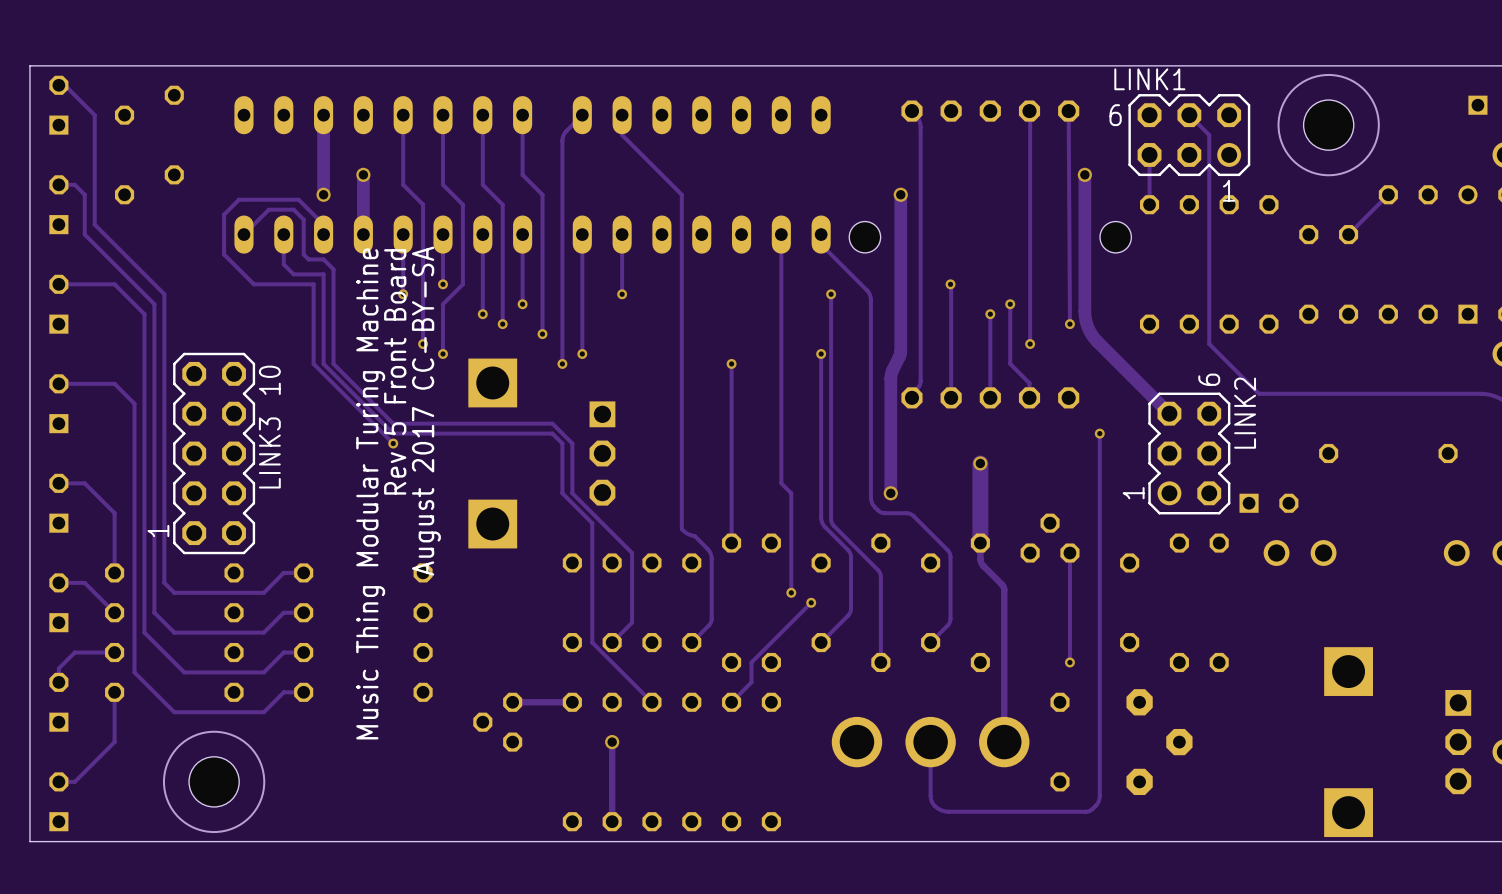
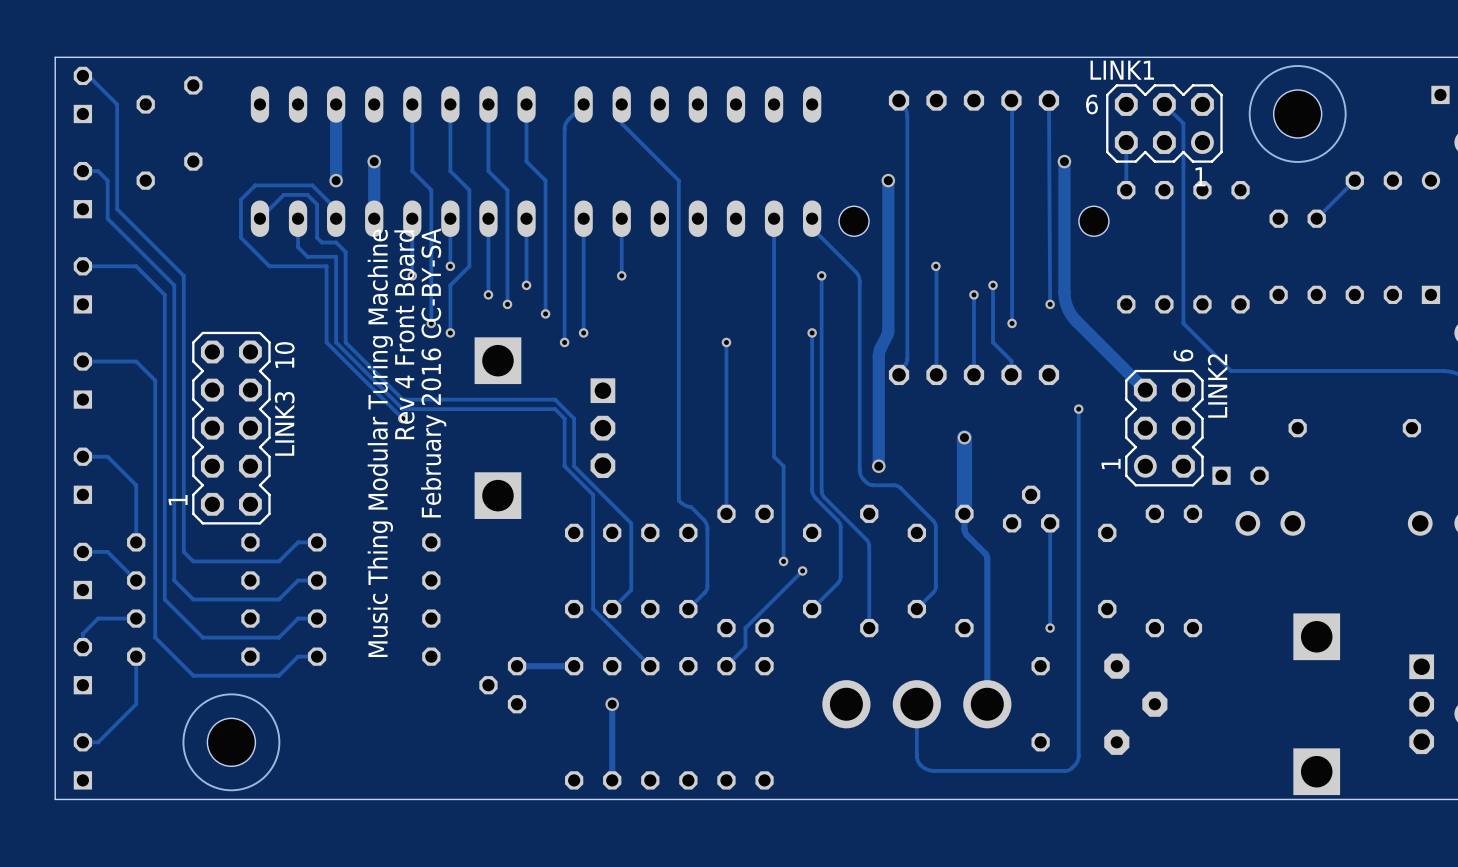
text: Rev 5 Front Board (395, 371) -> Rev 4 Front Board (404, 334)
text: August 2017 CC-BY-SA (426, 411) -> February 2016 CC-BY-SA (433, 372)

